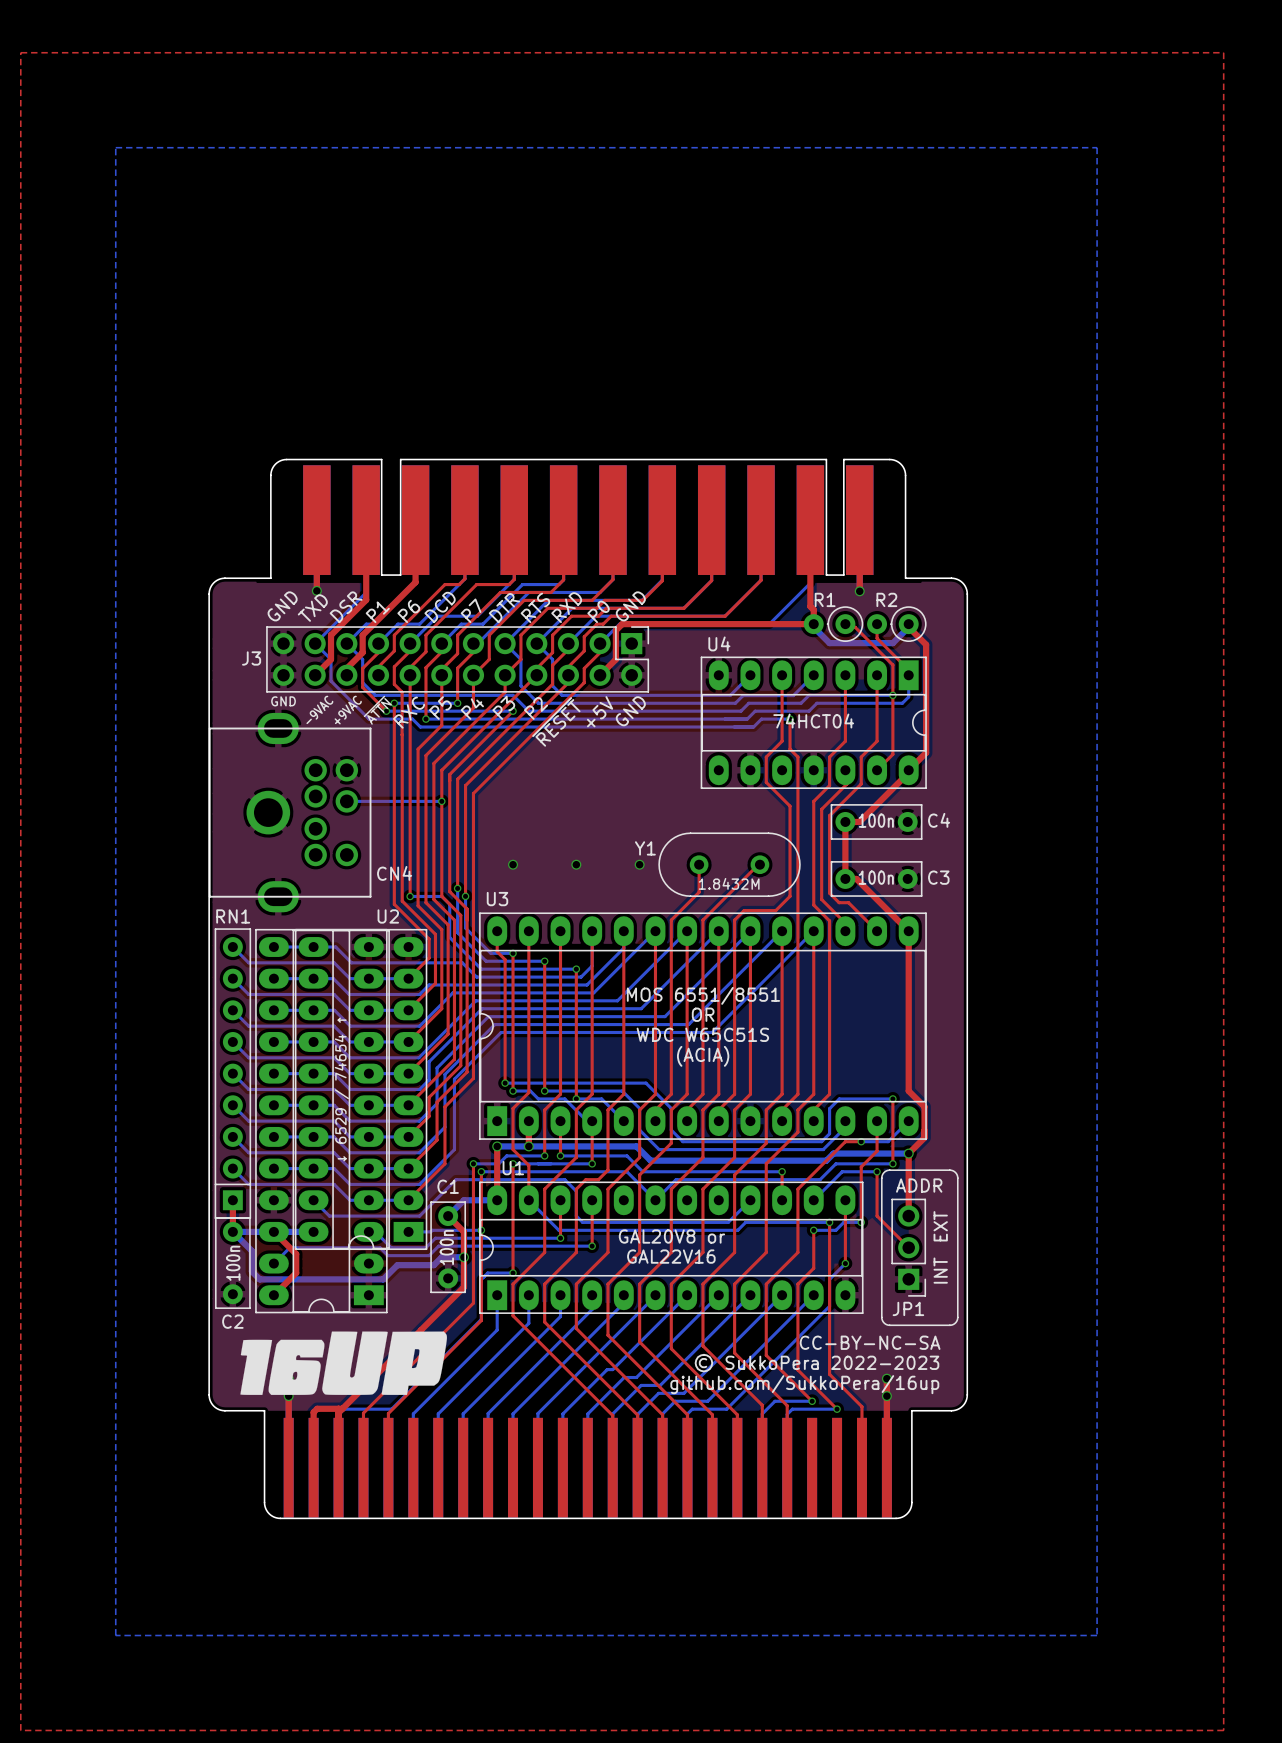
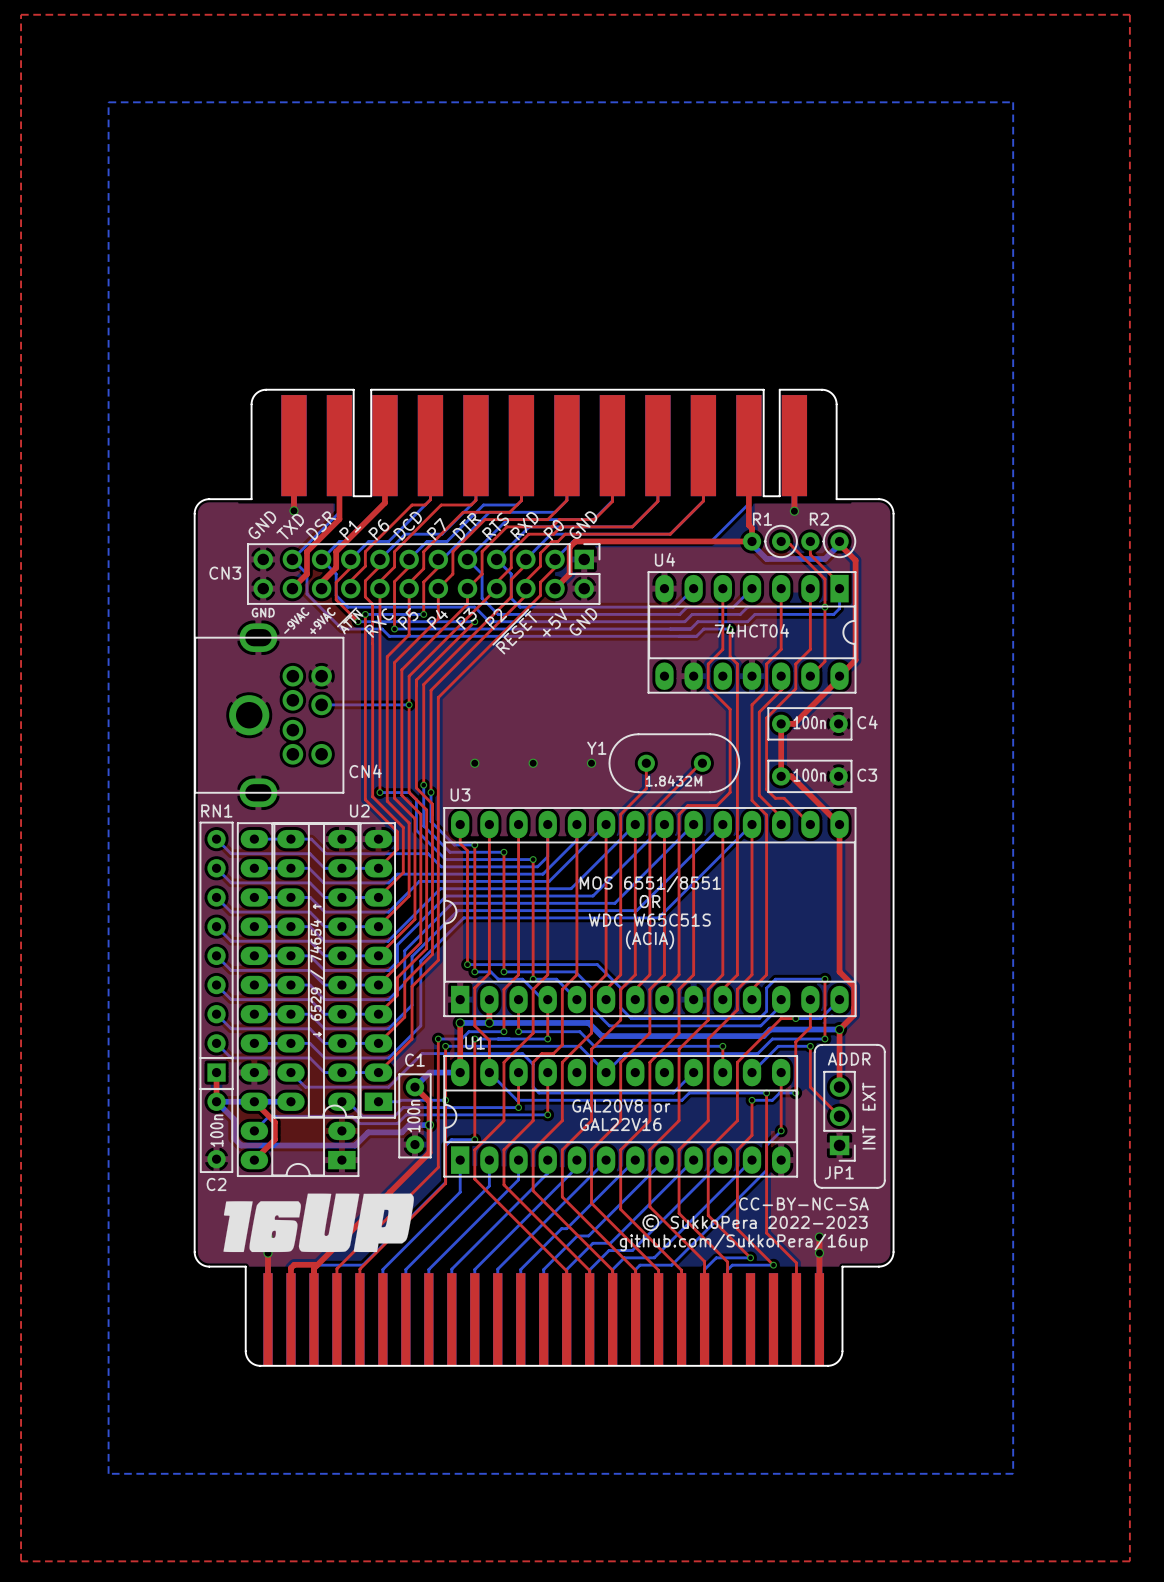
J3 name: J3 (251, 658) -> CN3 (225, 573)

